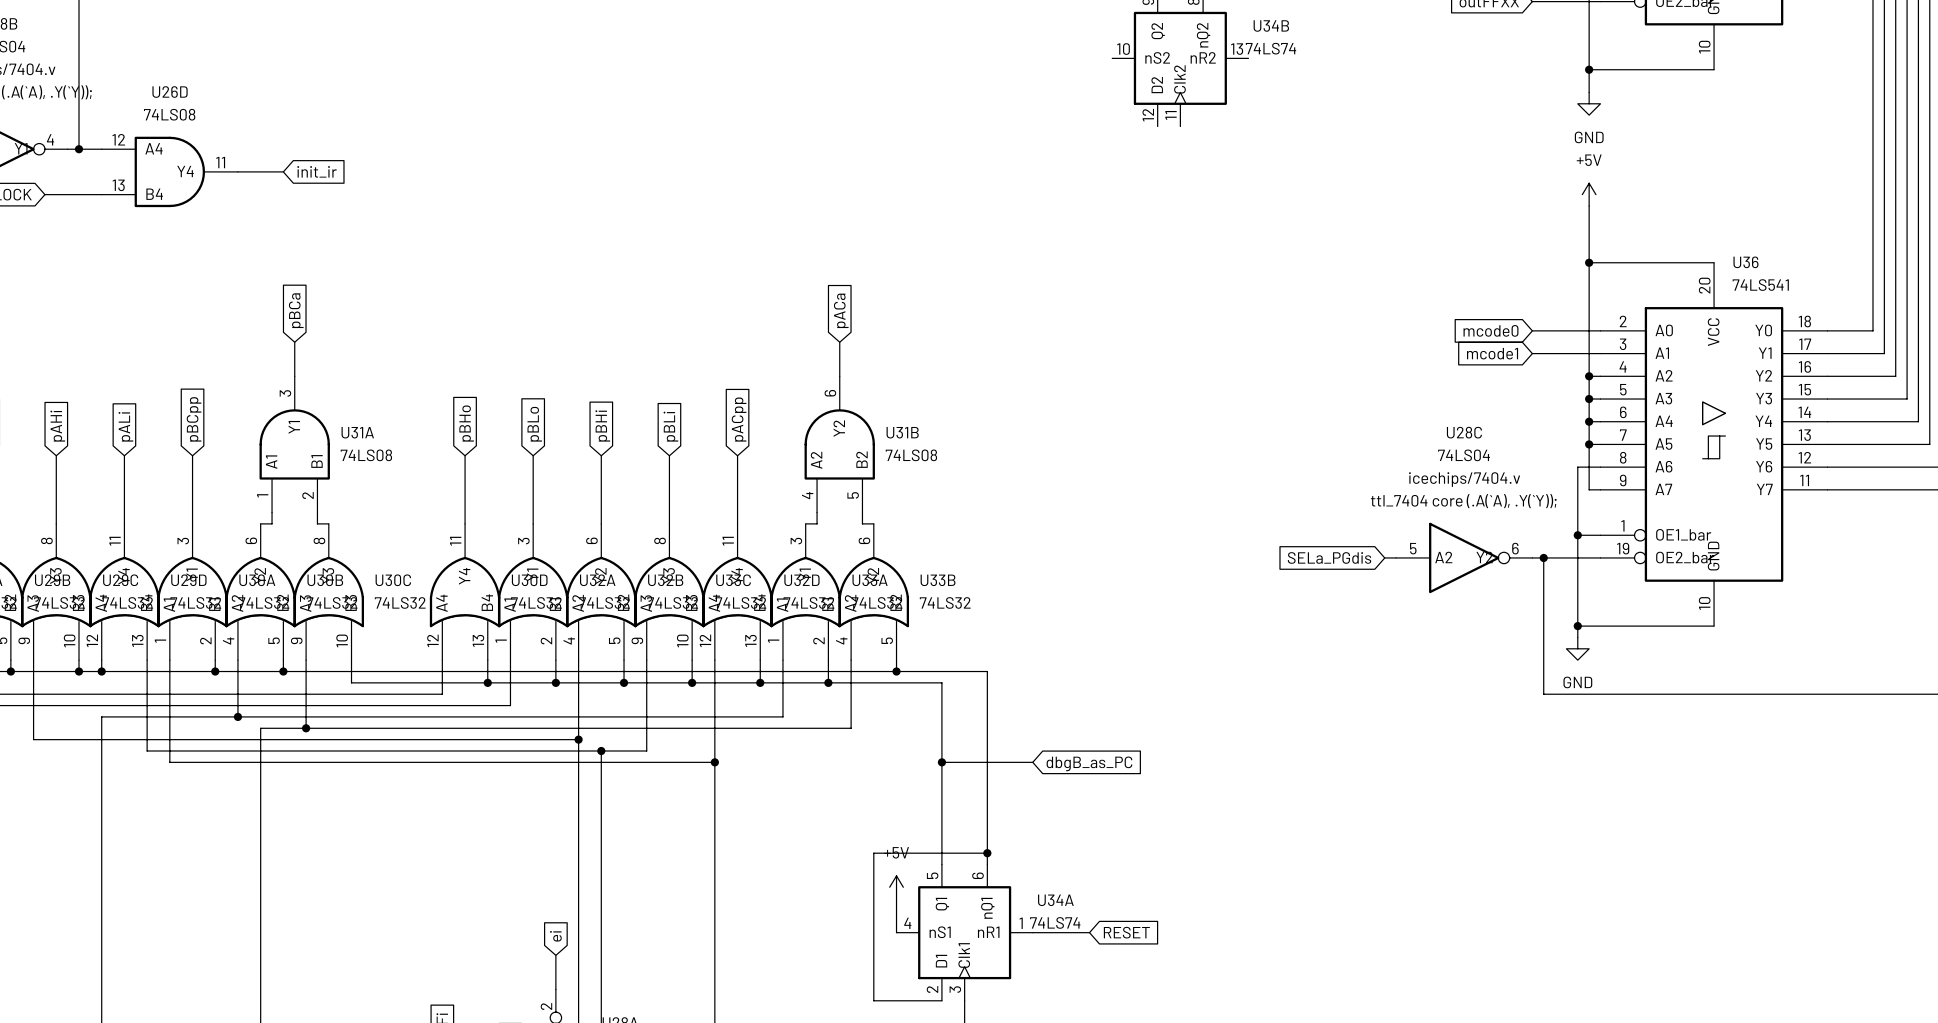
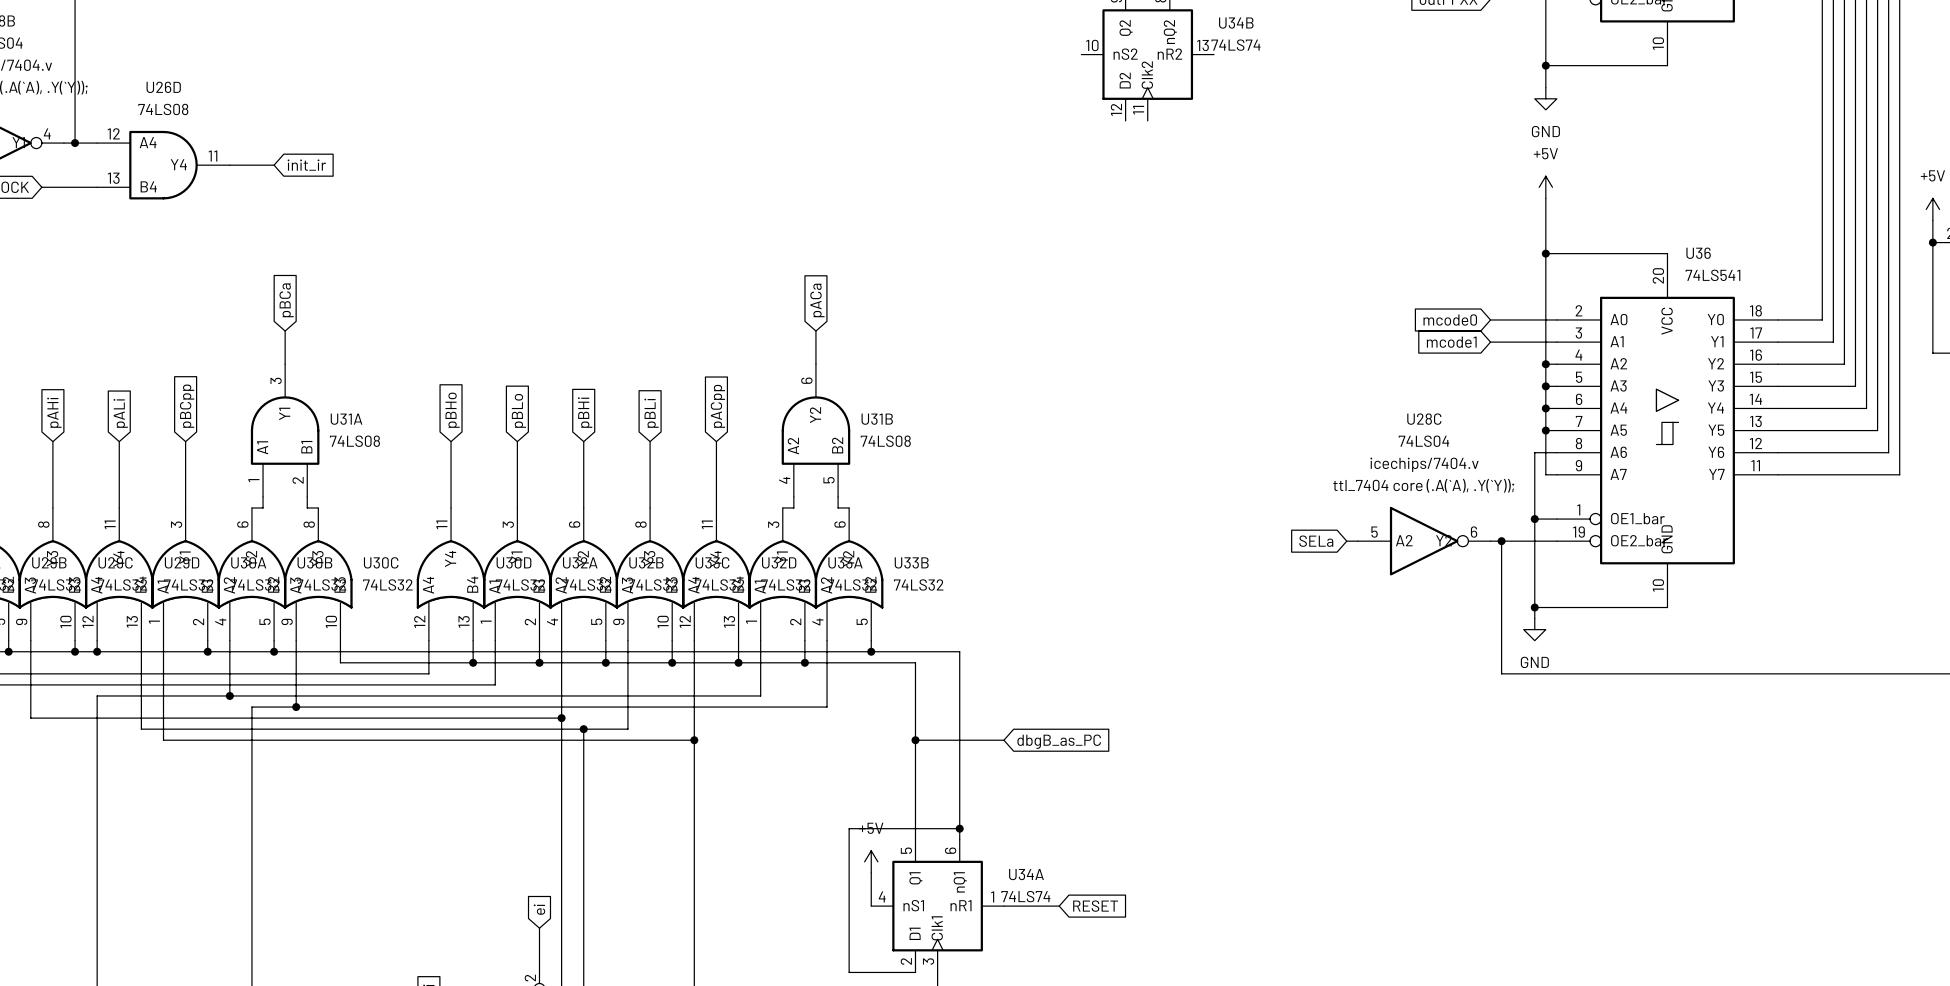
global label: SELa_PGdis (1329, 557) -> SELa (1316, 541)

